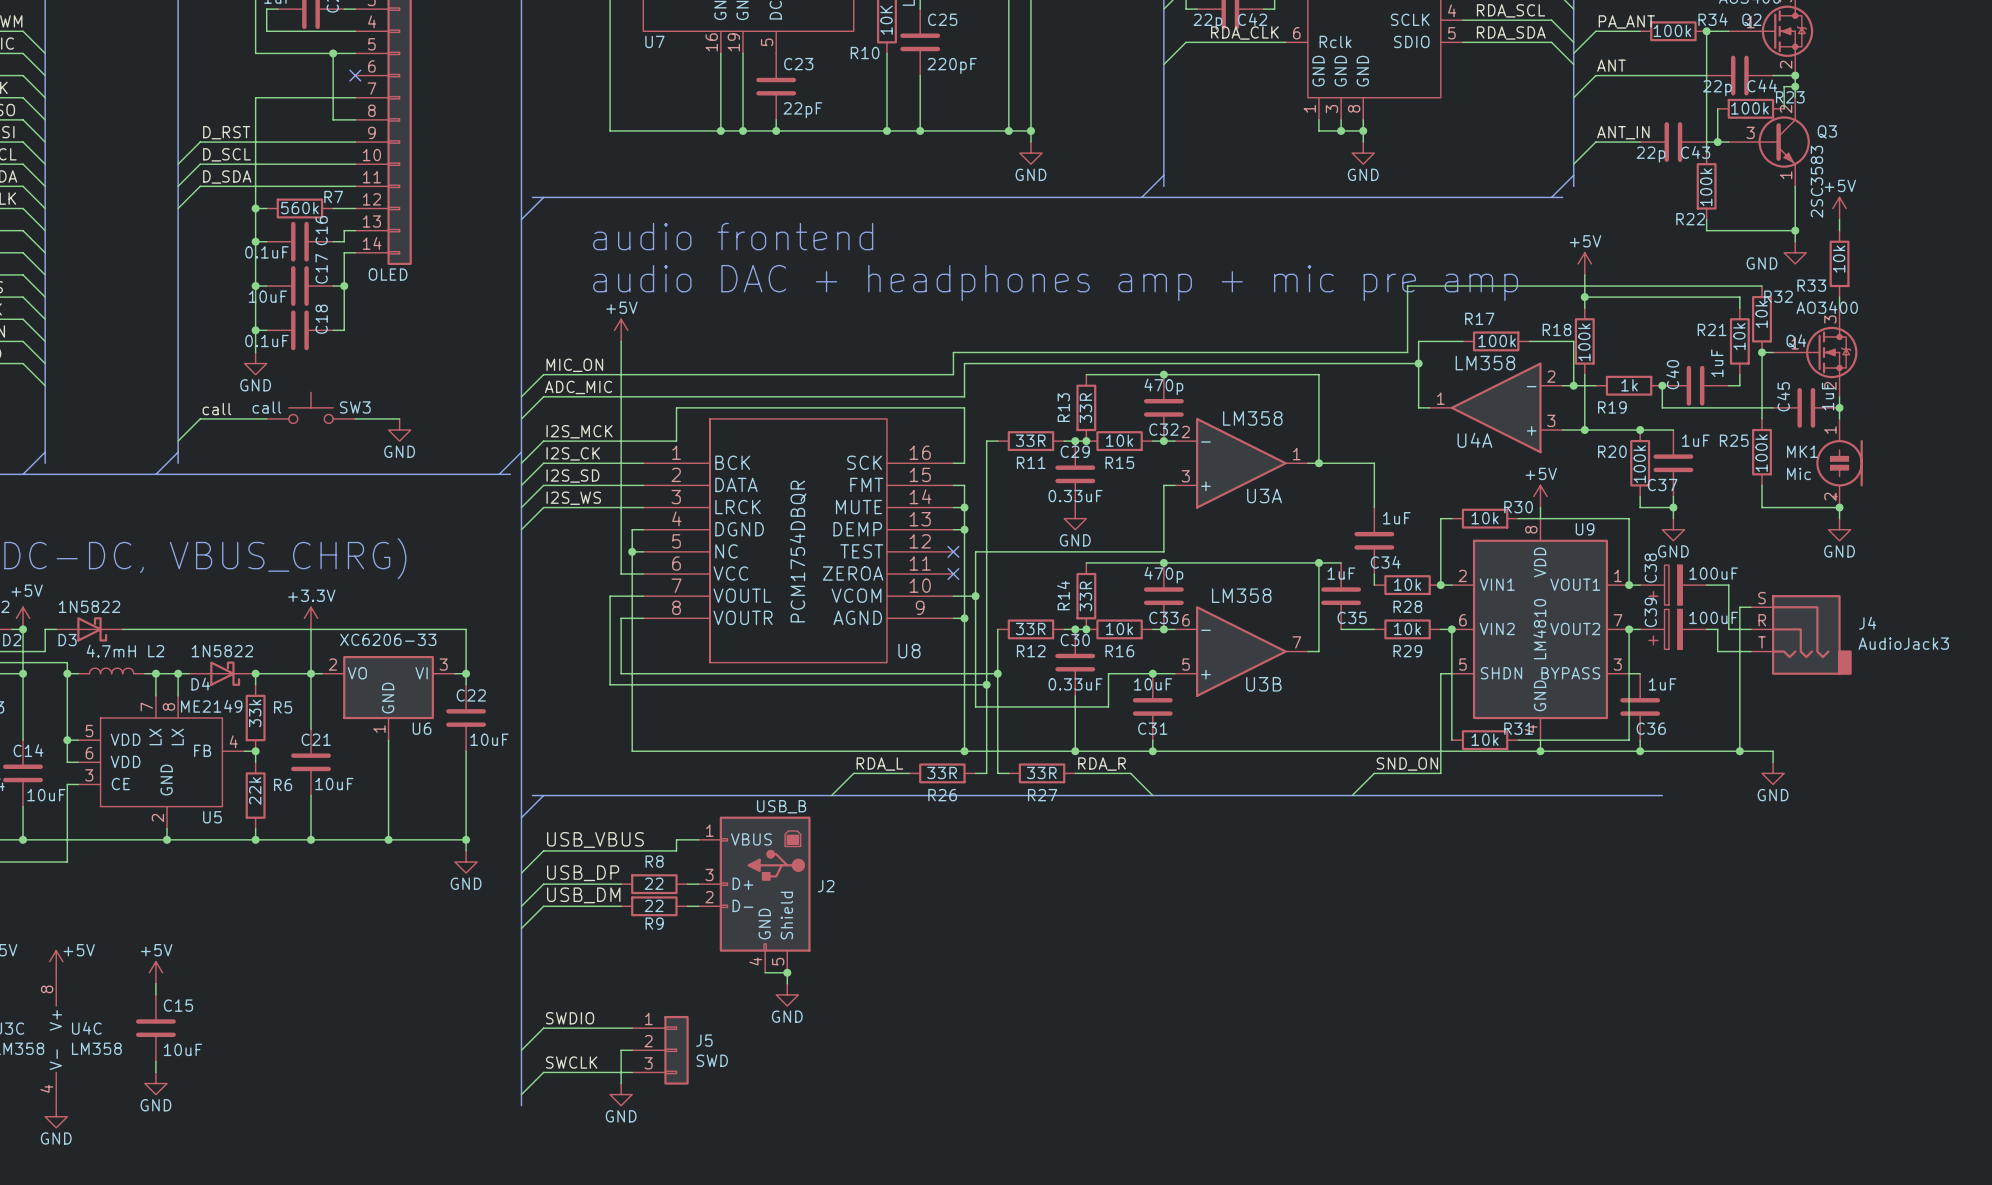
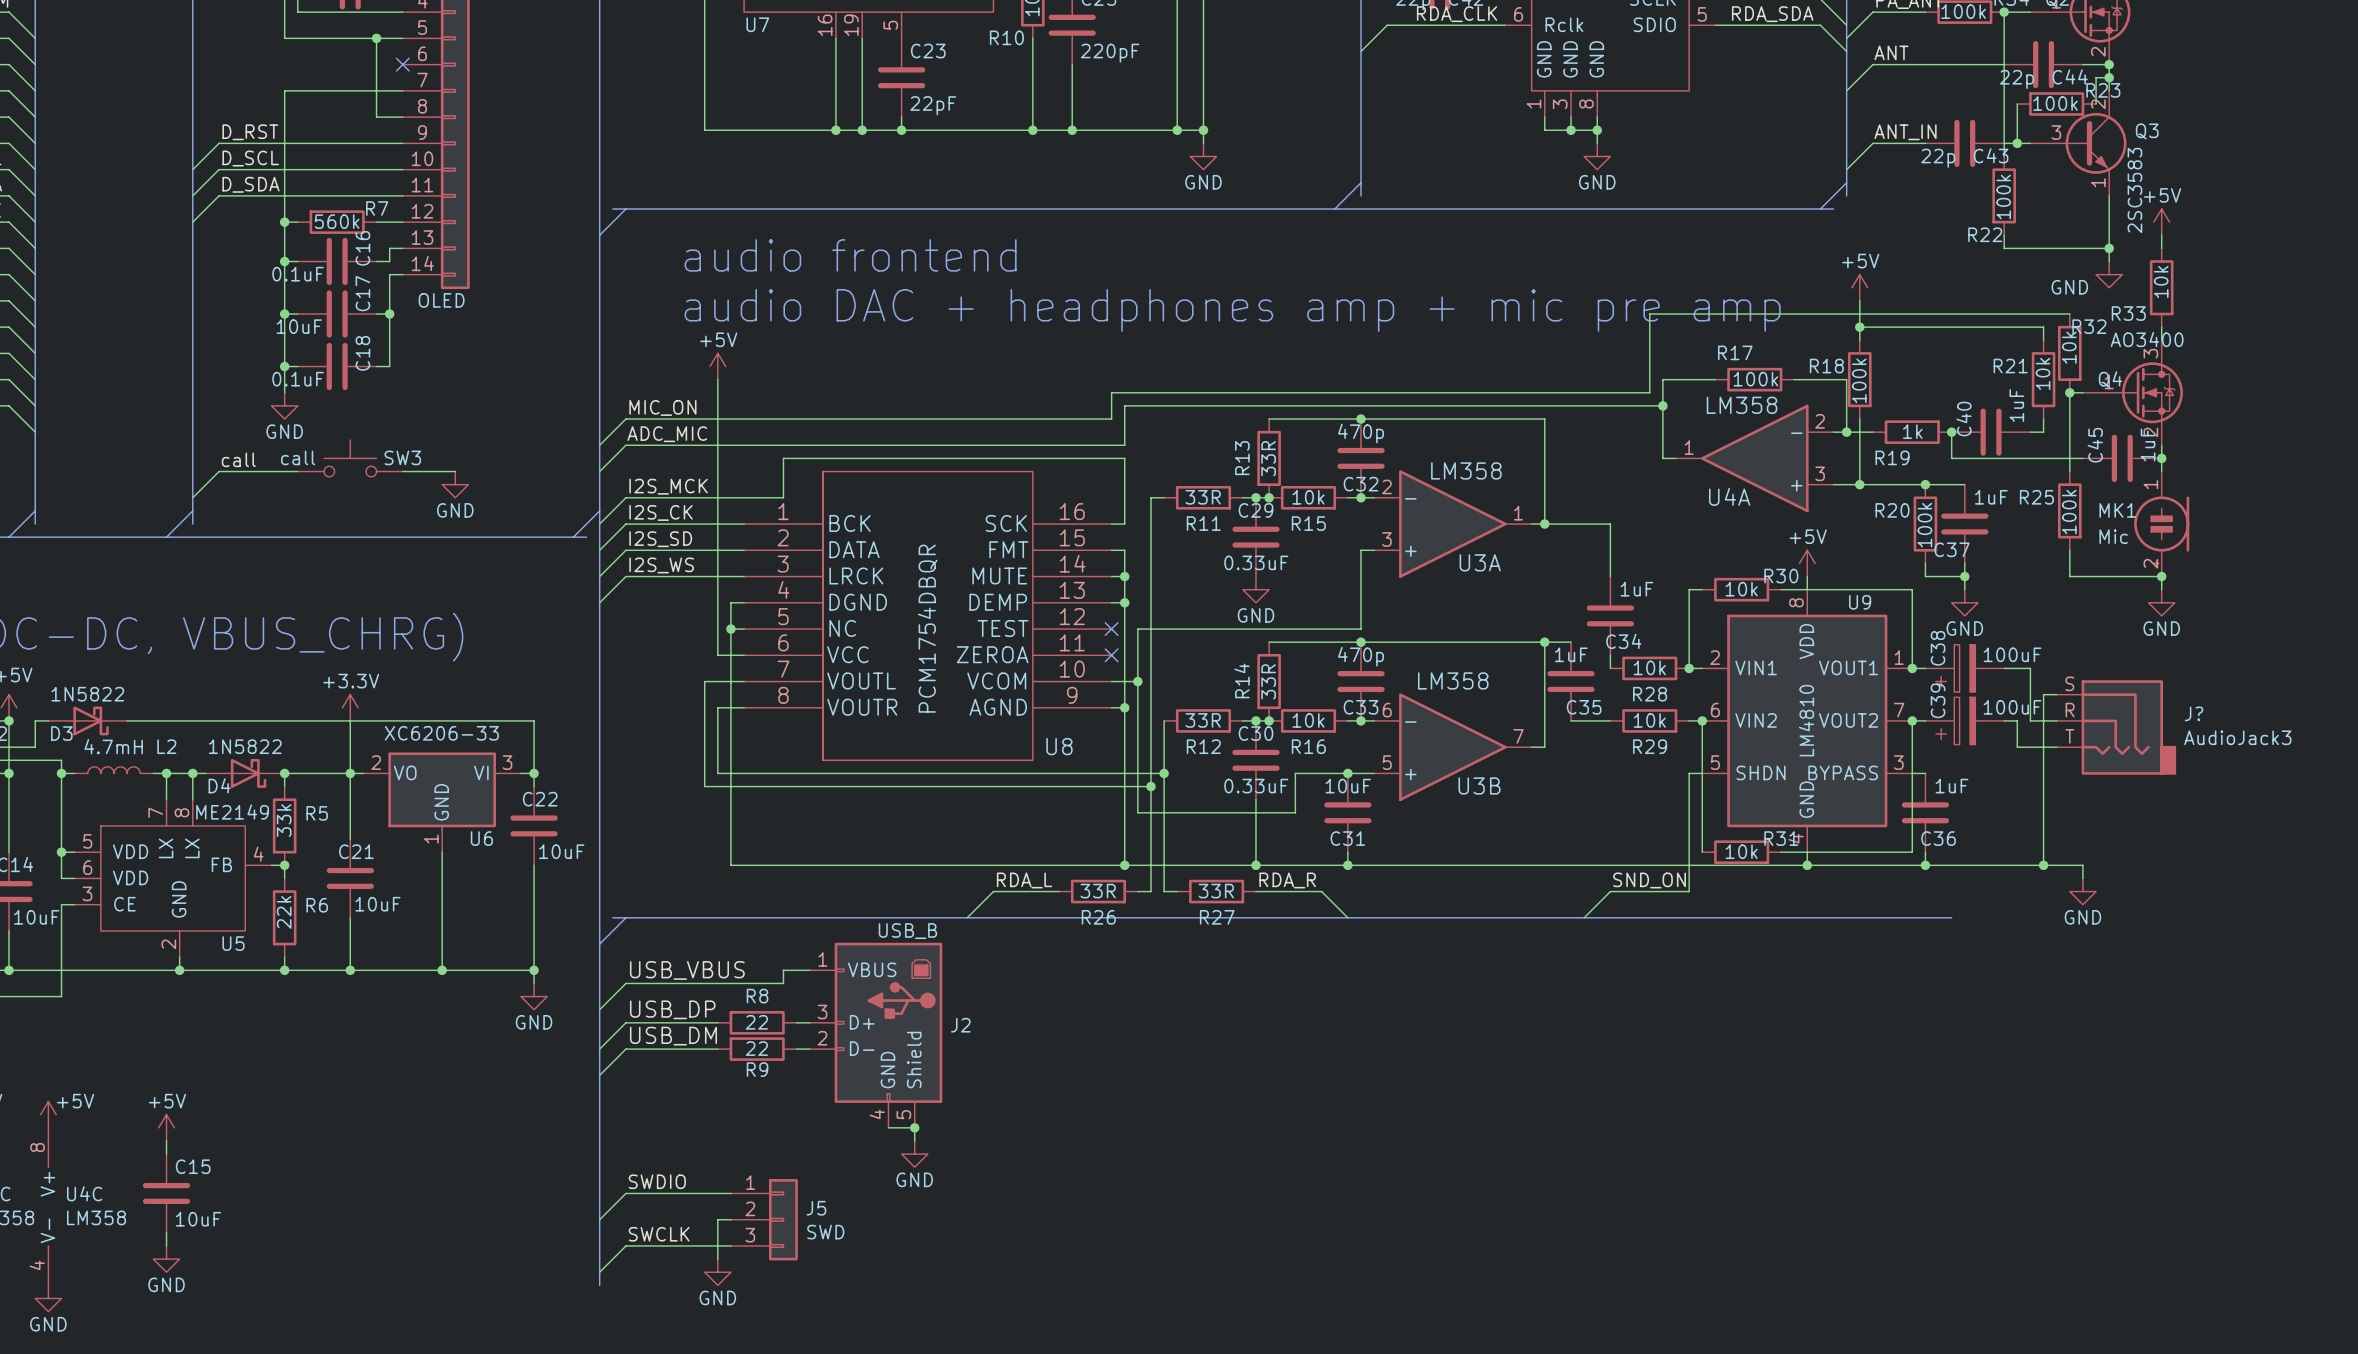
J4 name: J4 (1867, 623) -> J? (2194, 713)

